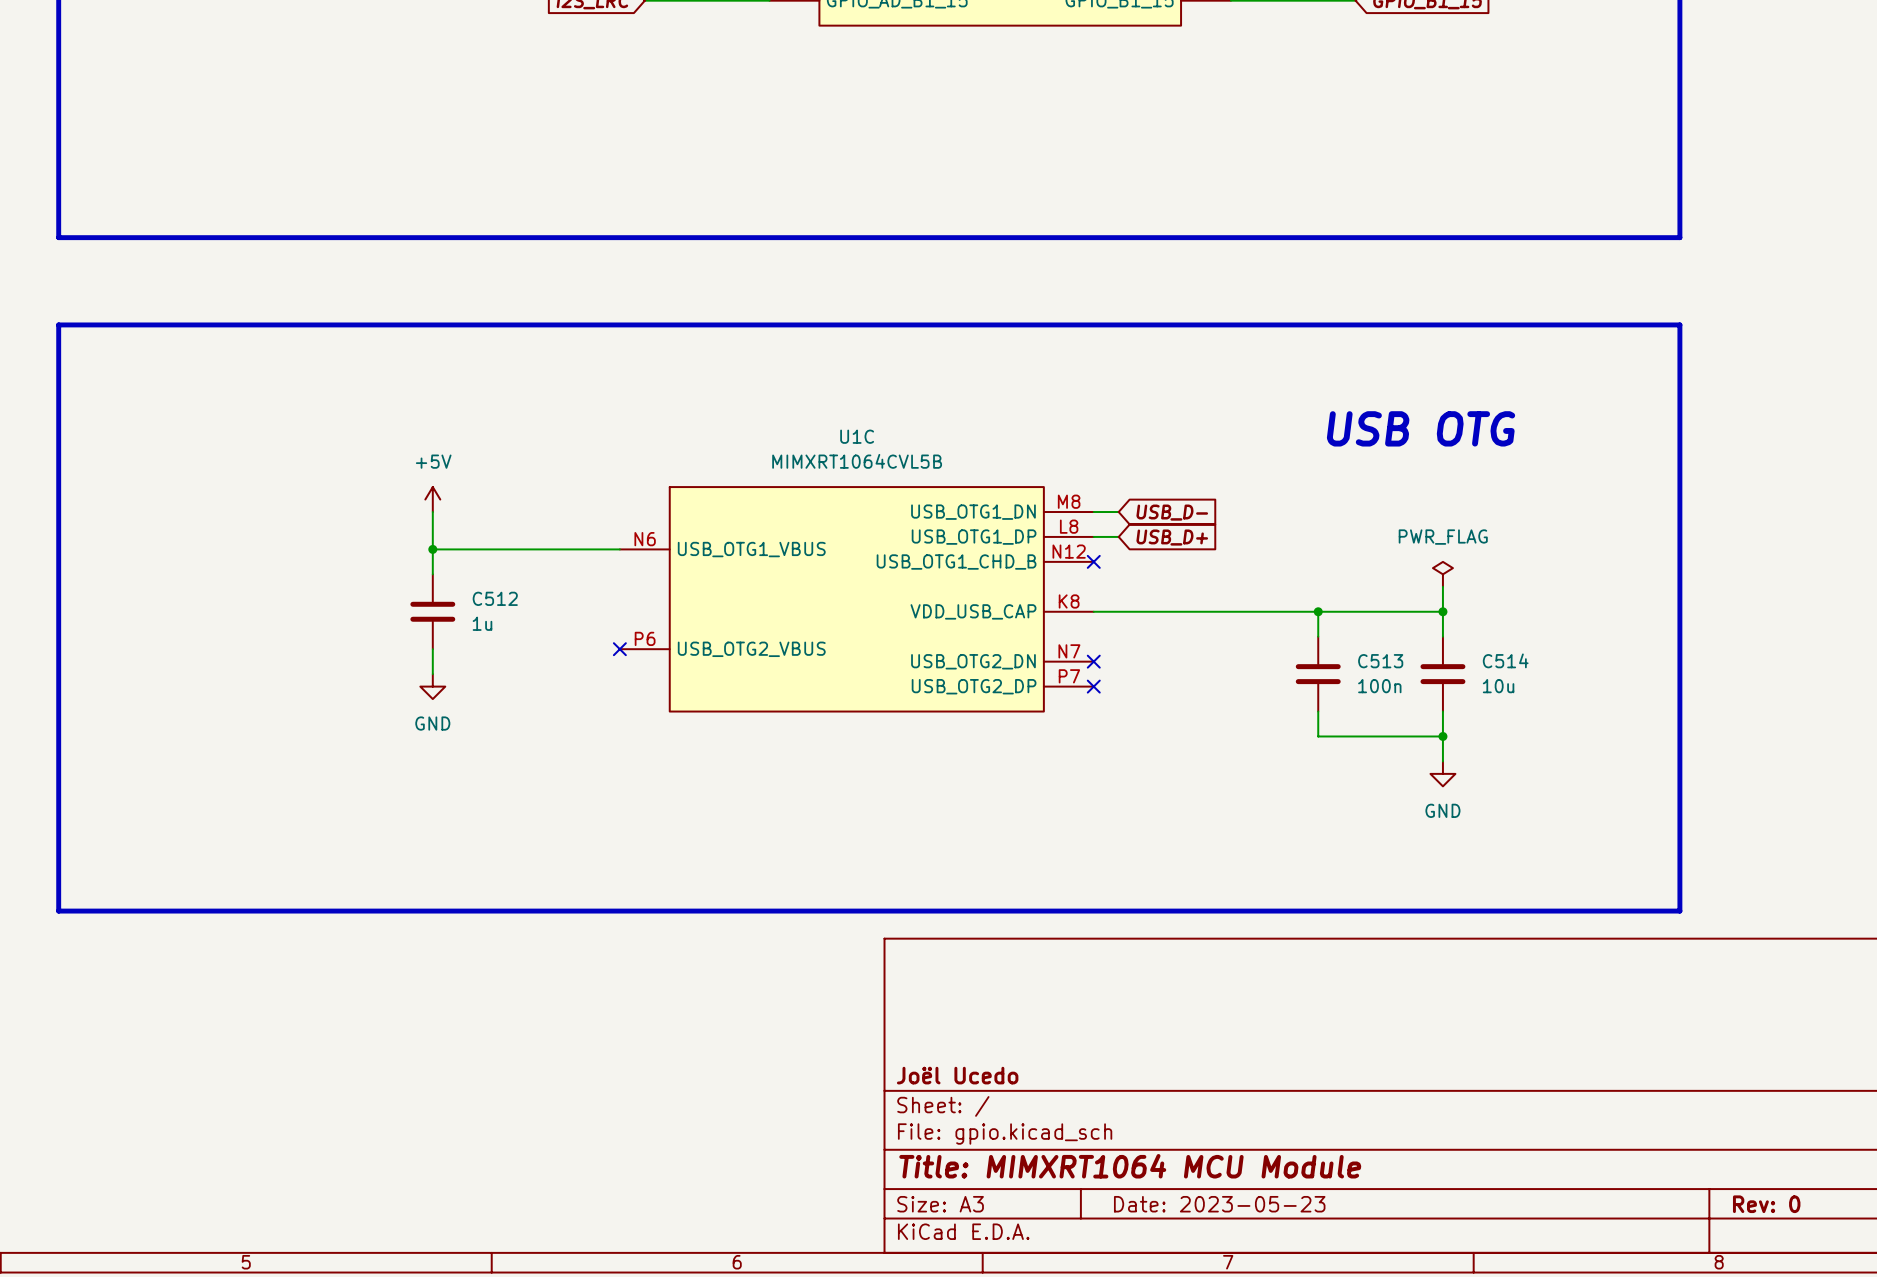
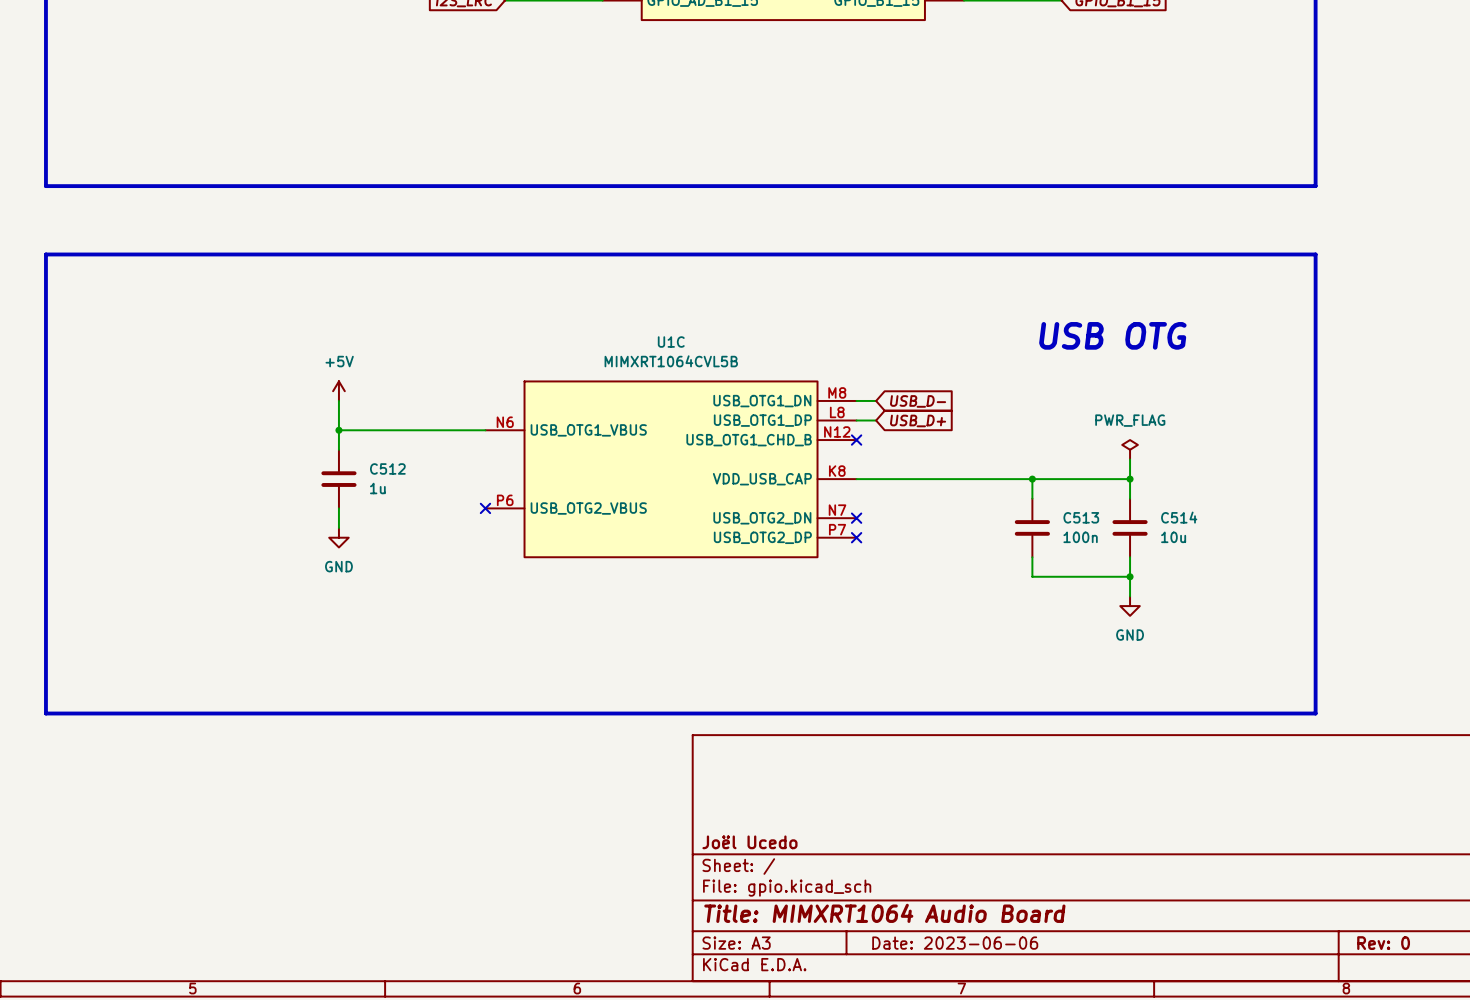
title block: Title: MIMXRT1064 MCU Module (1130, 1166) -> Title: MIMXRT1064 Audio Board (884, 913)
title block: Date: 2023-05-23 (1219, 1204) -> Date: 2023-06-06 (955, 943)

